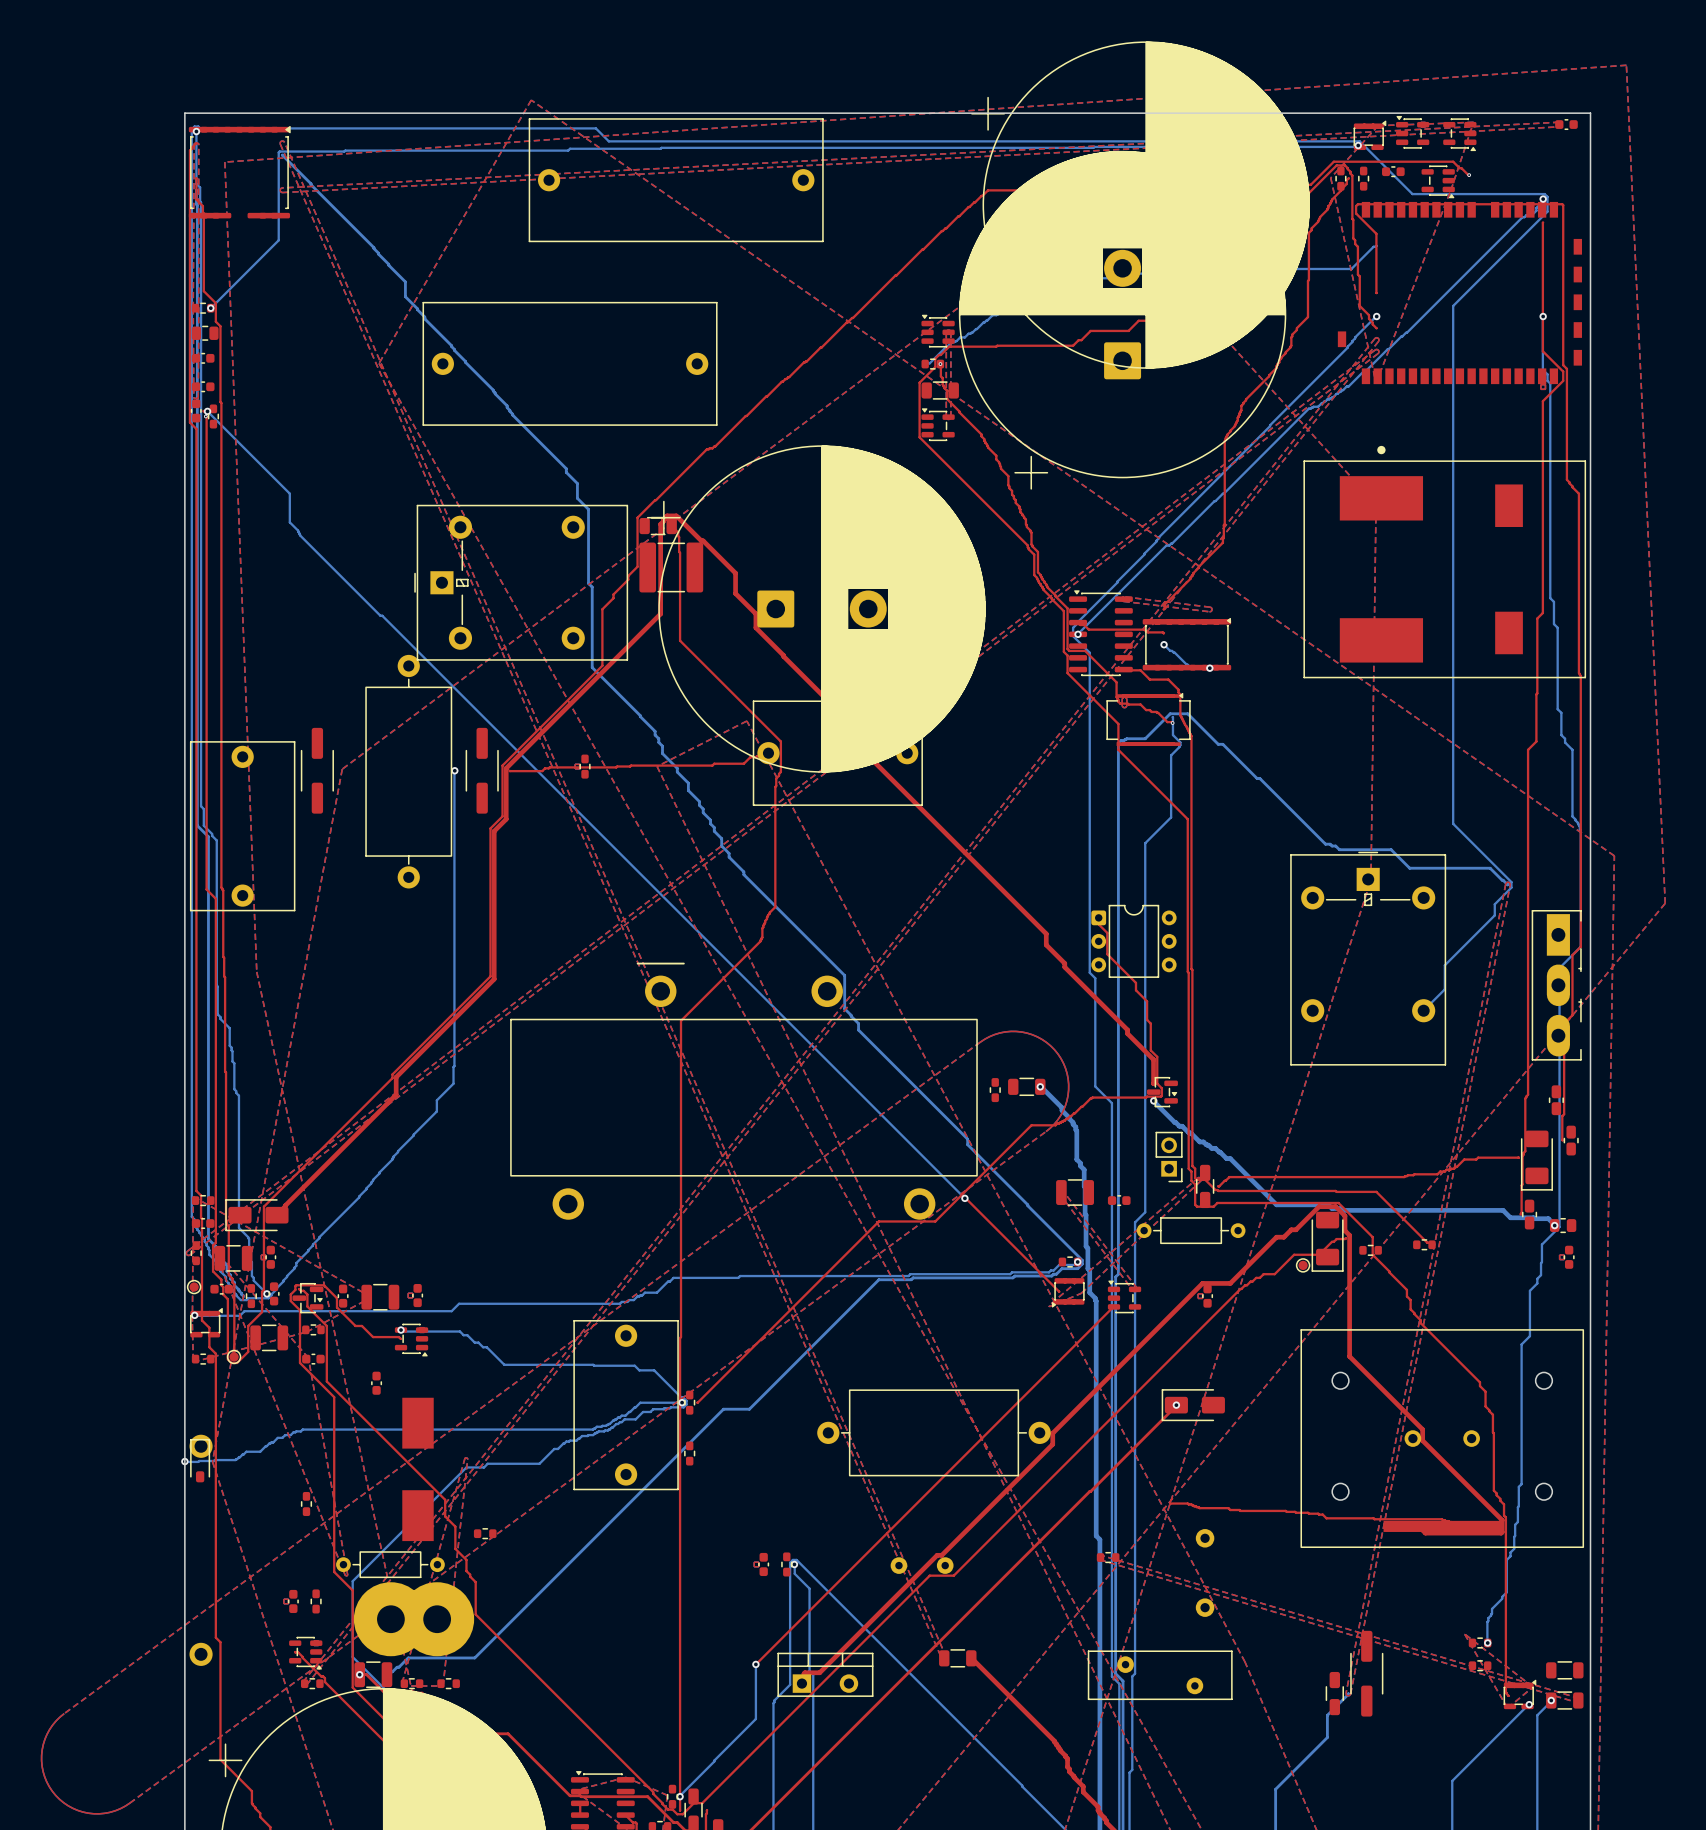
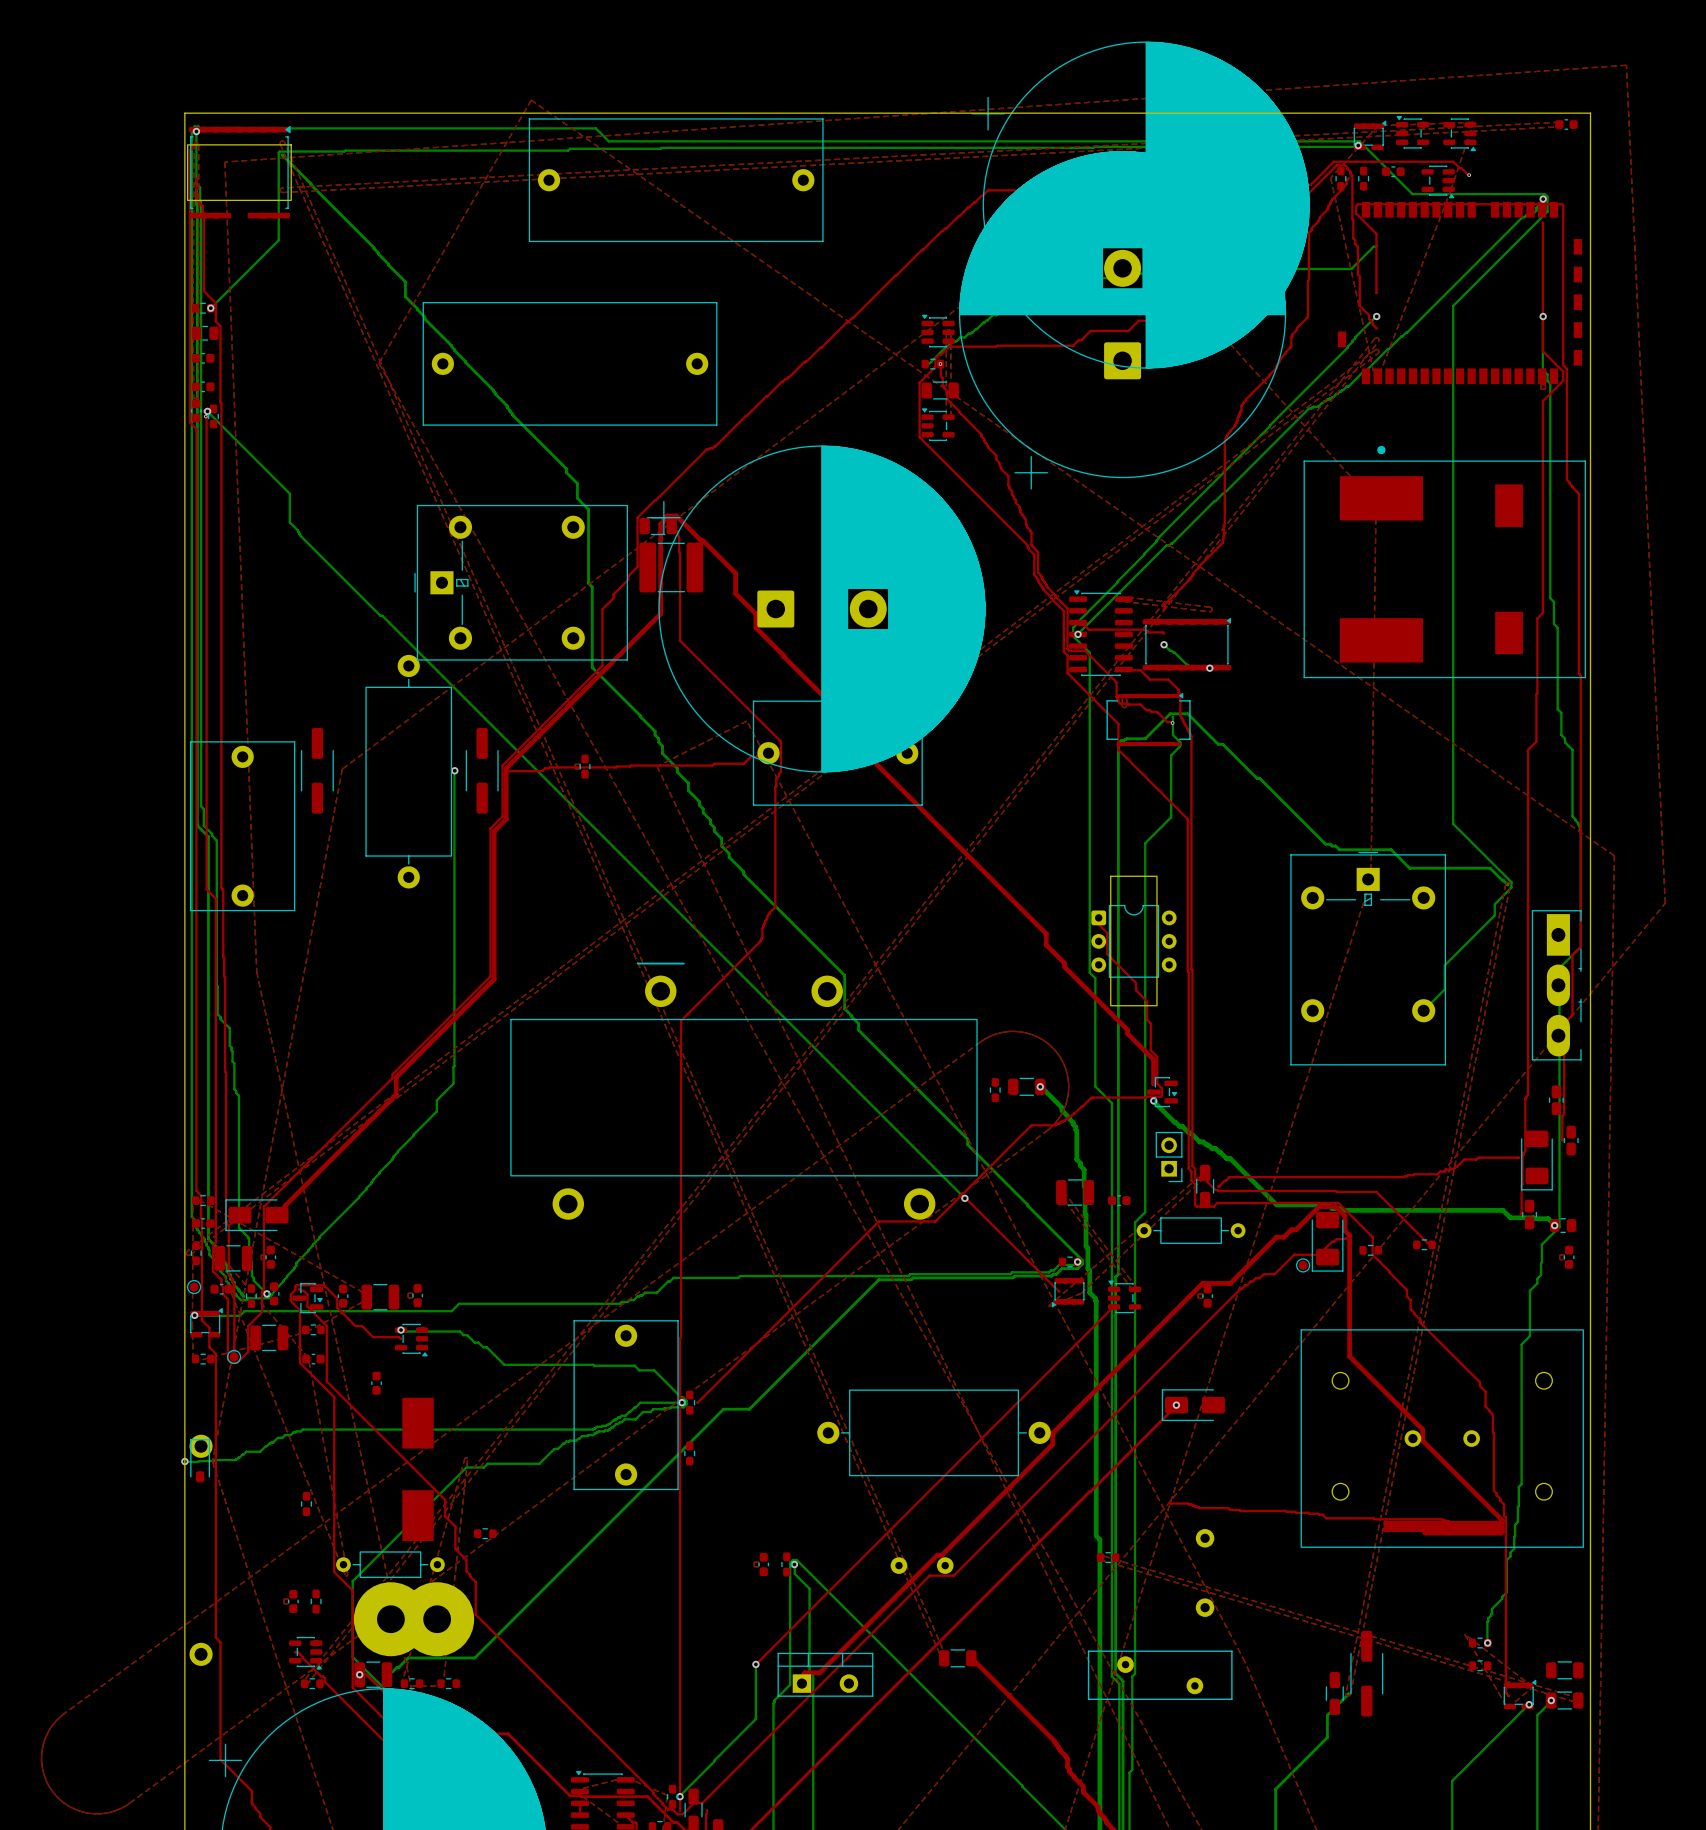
part footprint: [188, 125, 291, 219] -> [187, 125, 292, 219]
part footprint: [1091, 905, 1177, 978] -> [1091, 875, 1177, 1007]

